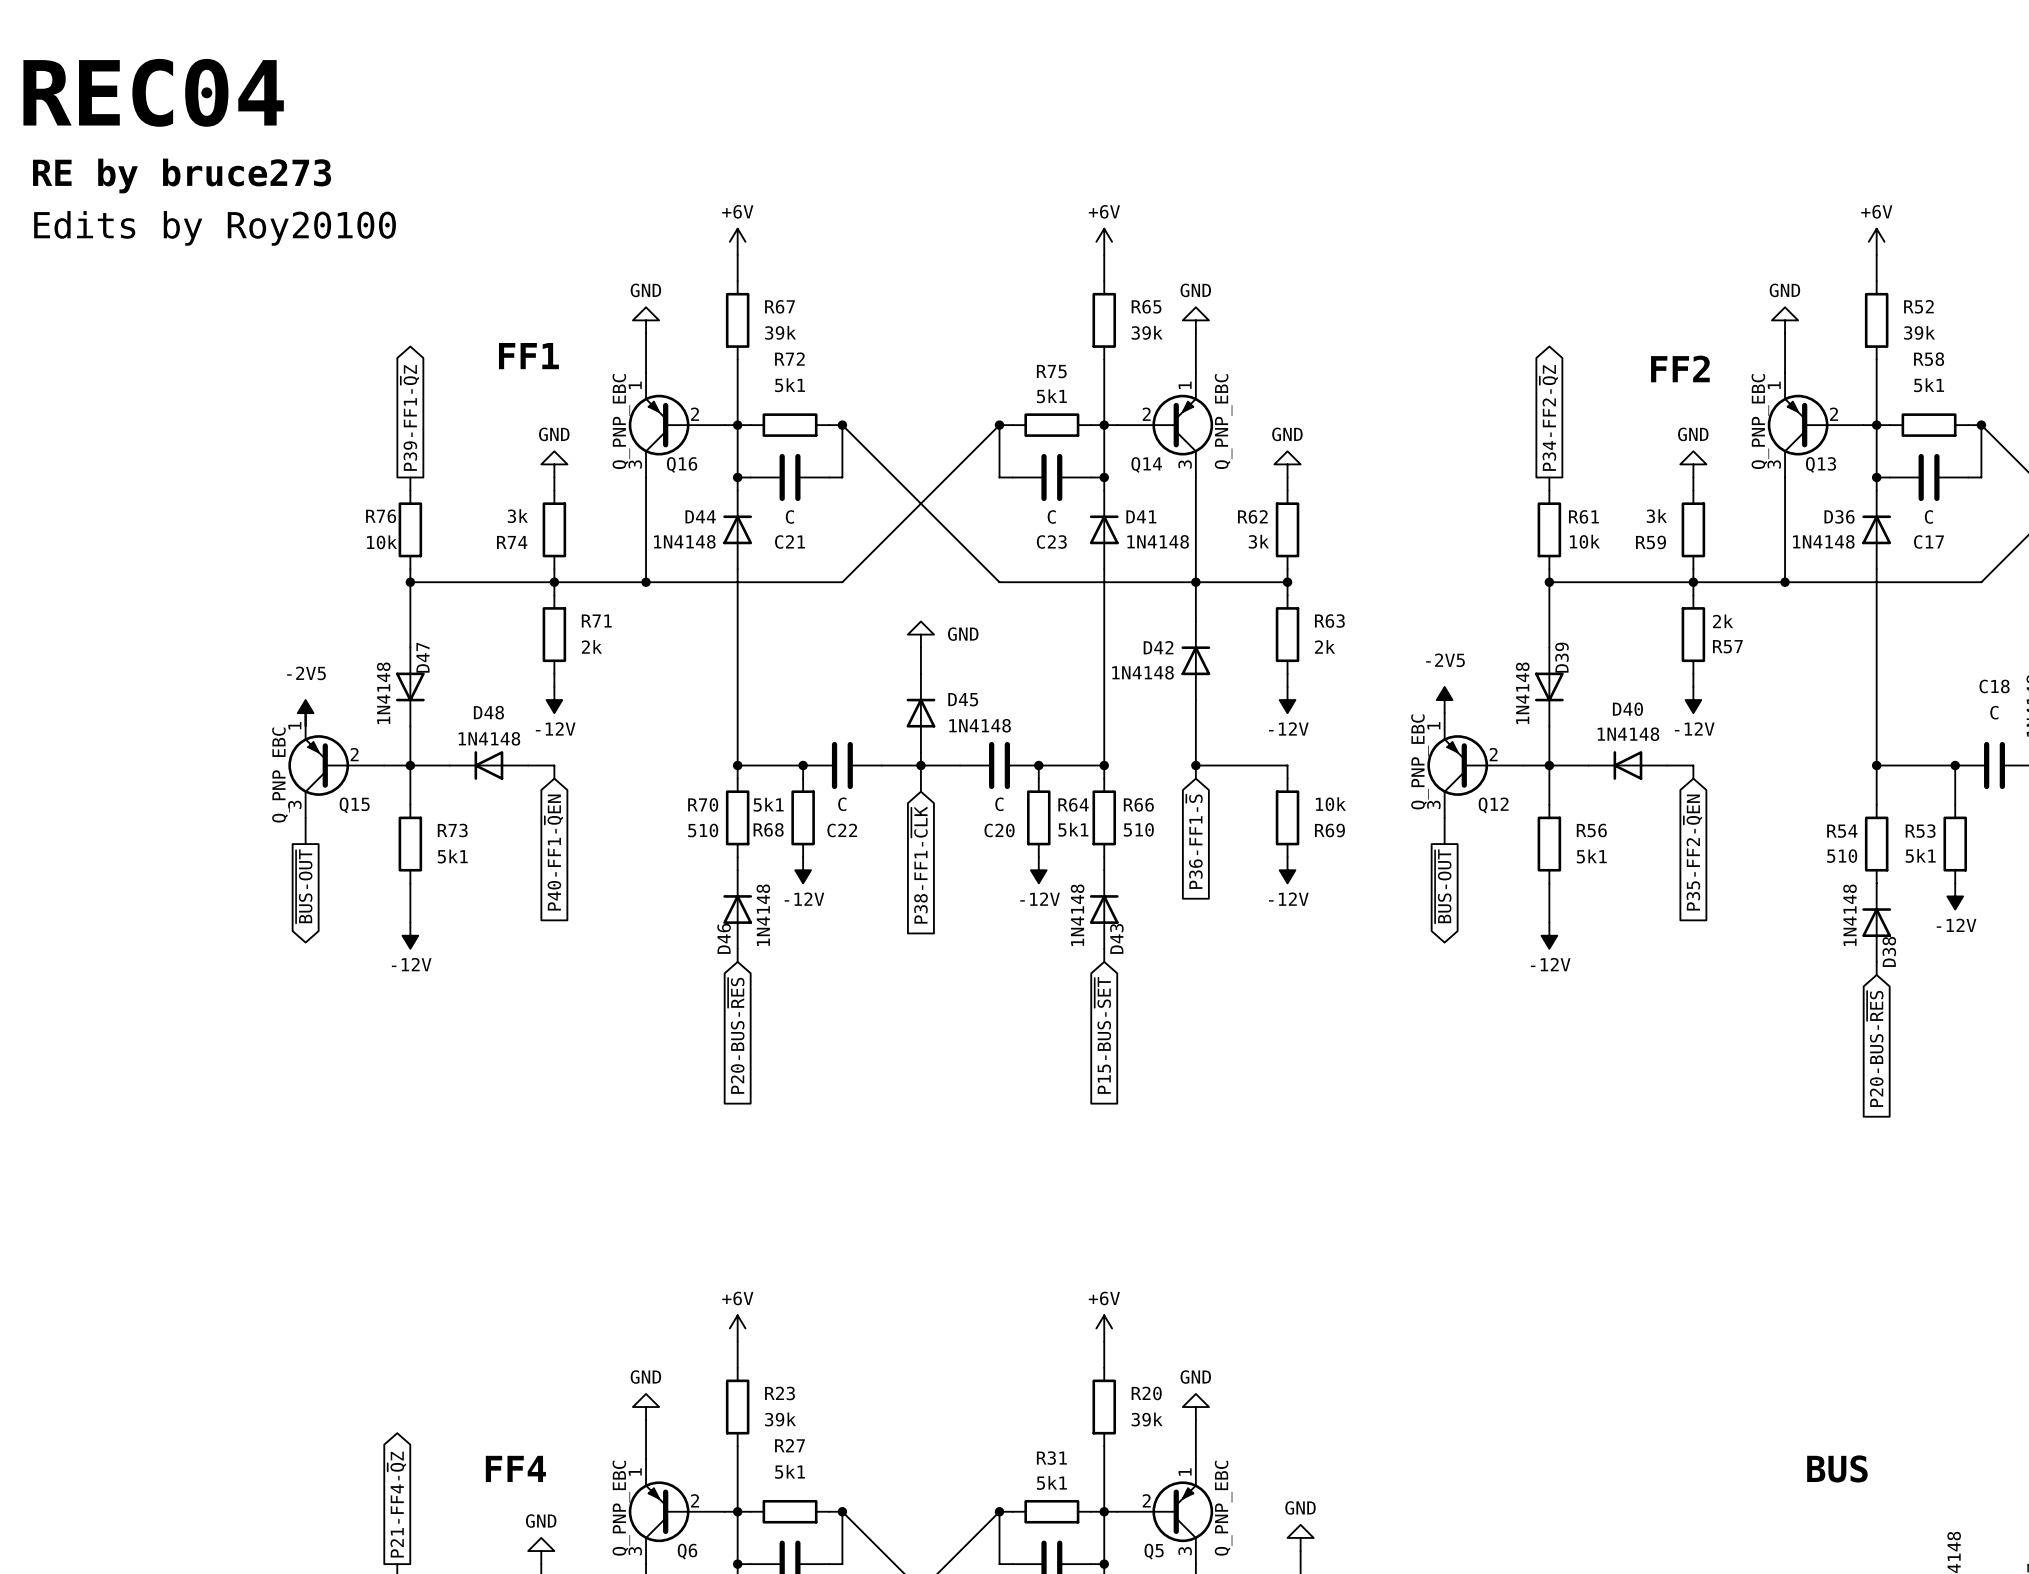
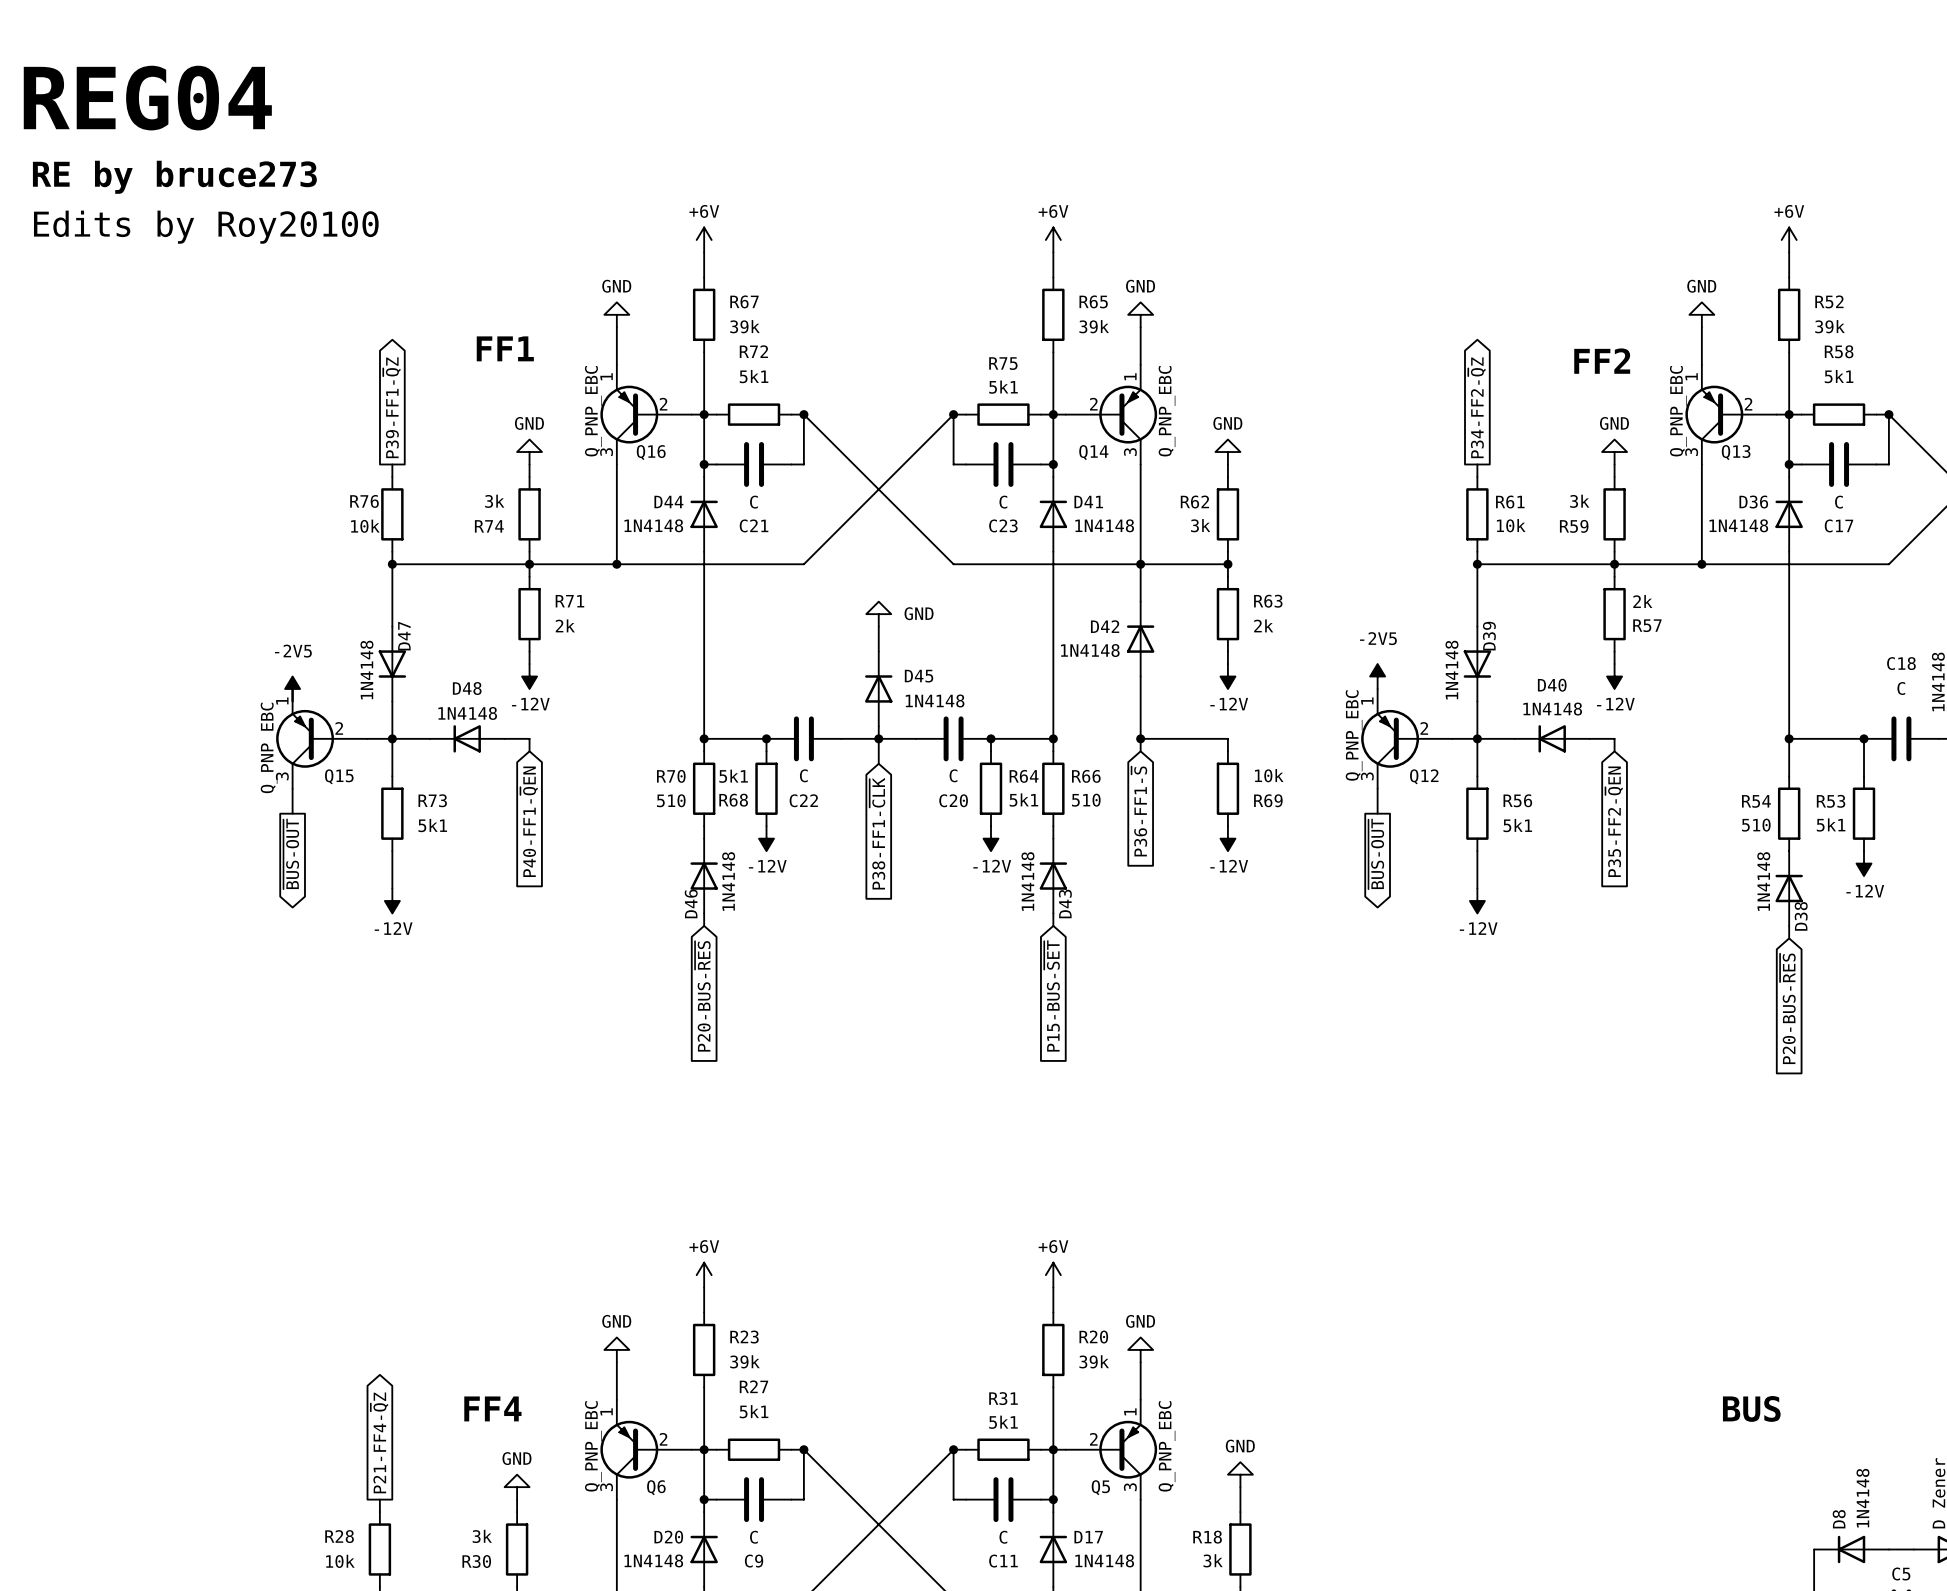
text: REC04 (153, 92) -> REG04 (147, 98)

